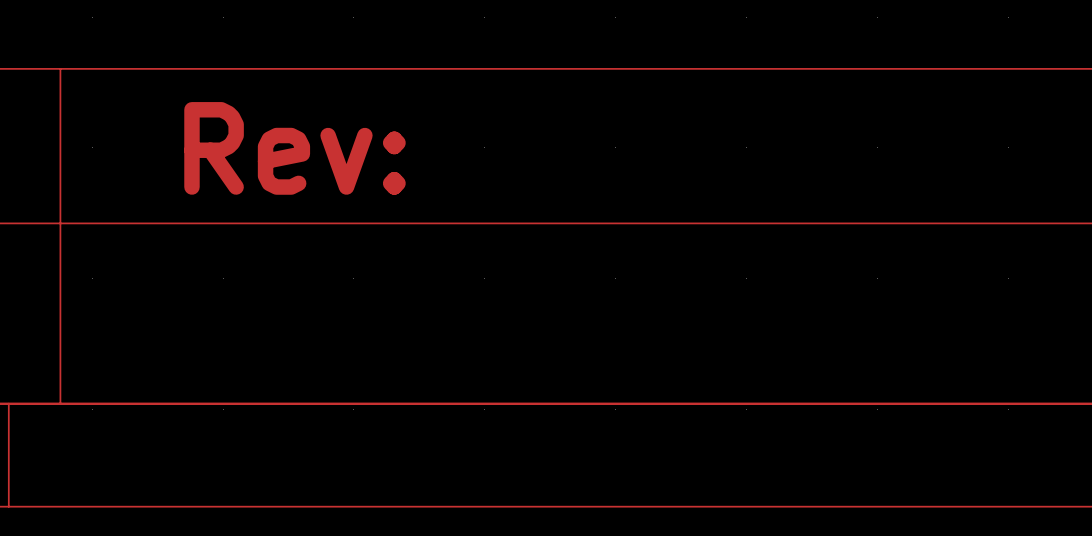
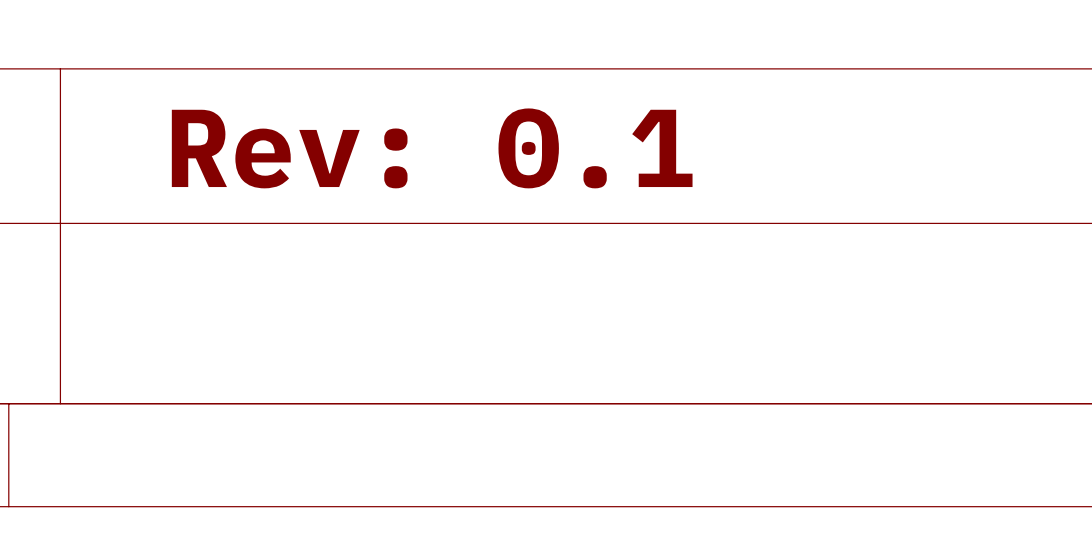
title block: Rev: (295, 148) -> Rev: 0.1 (432, 148)

